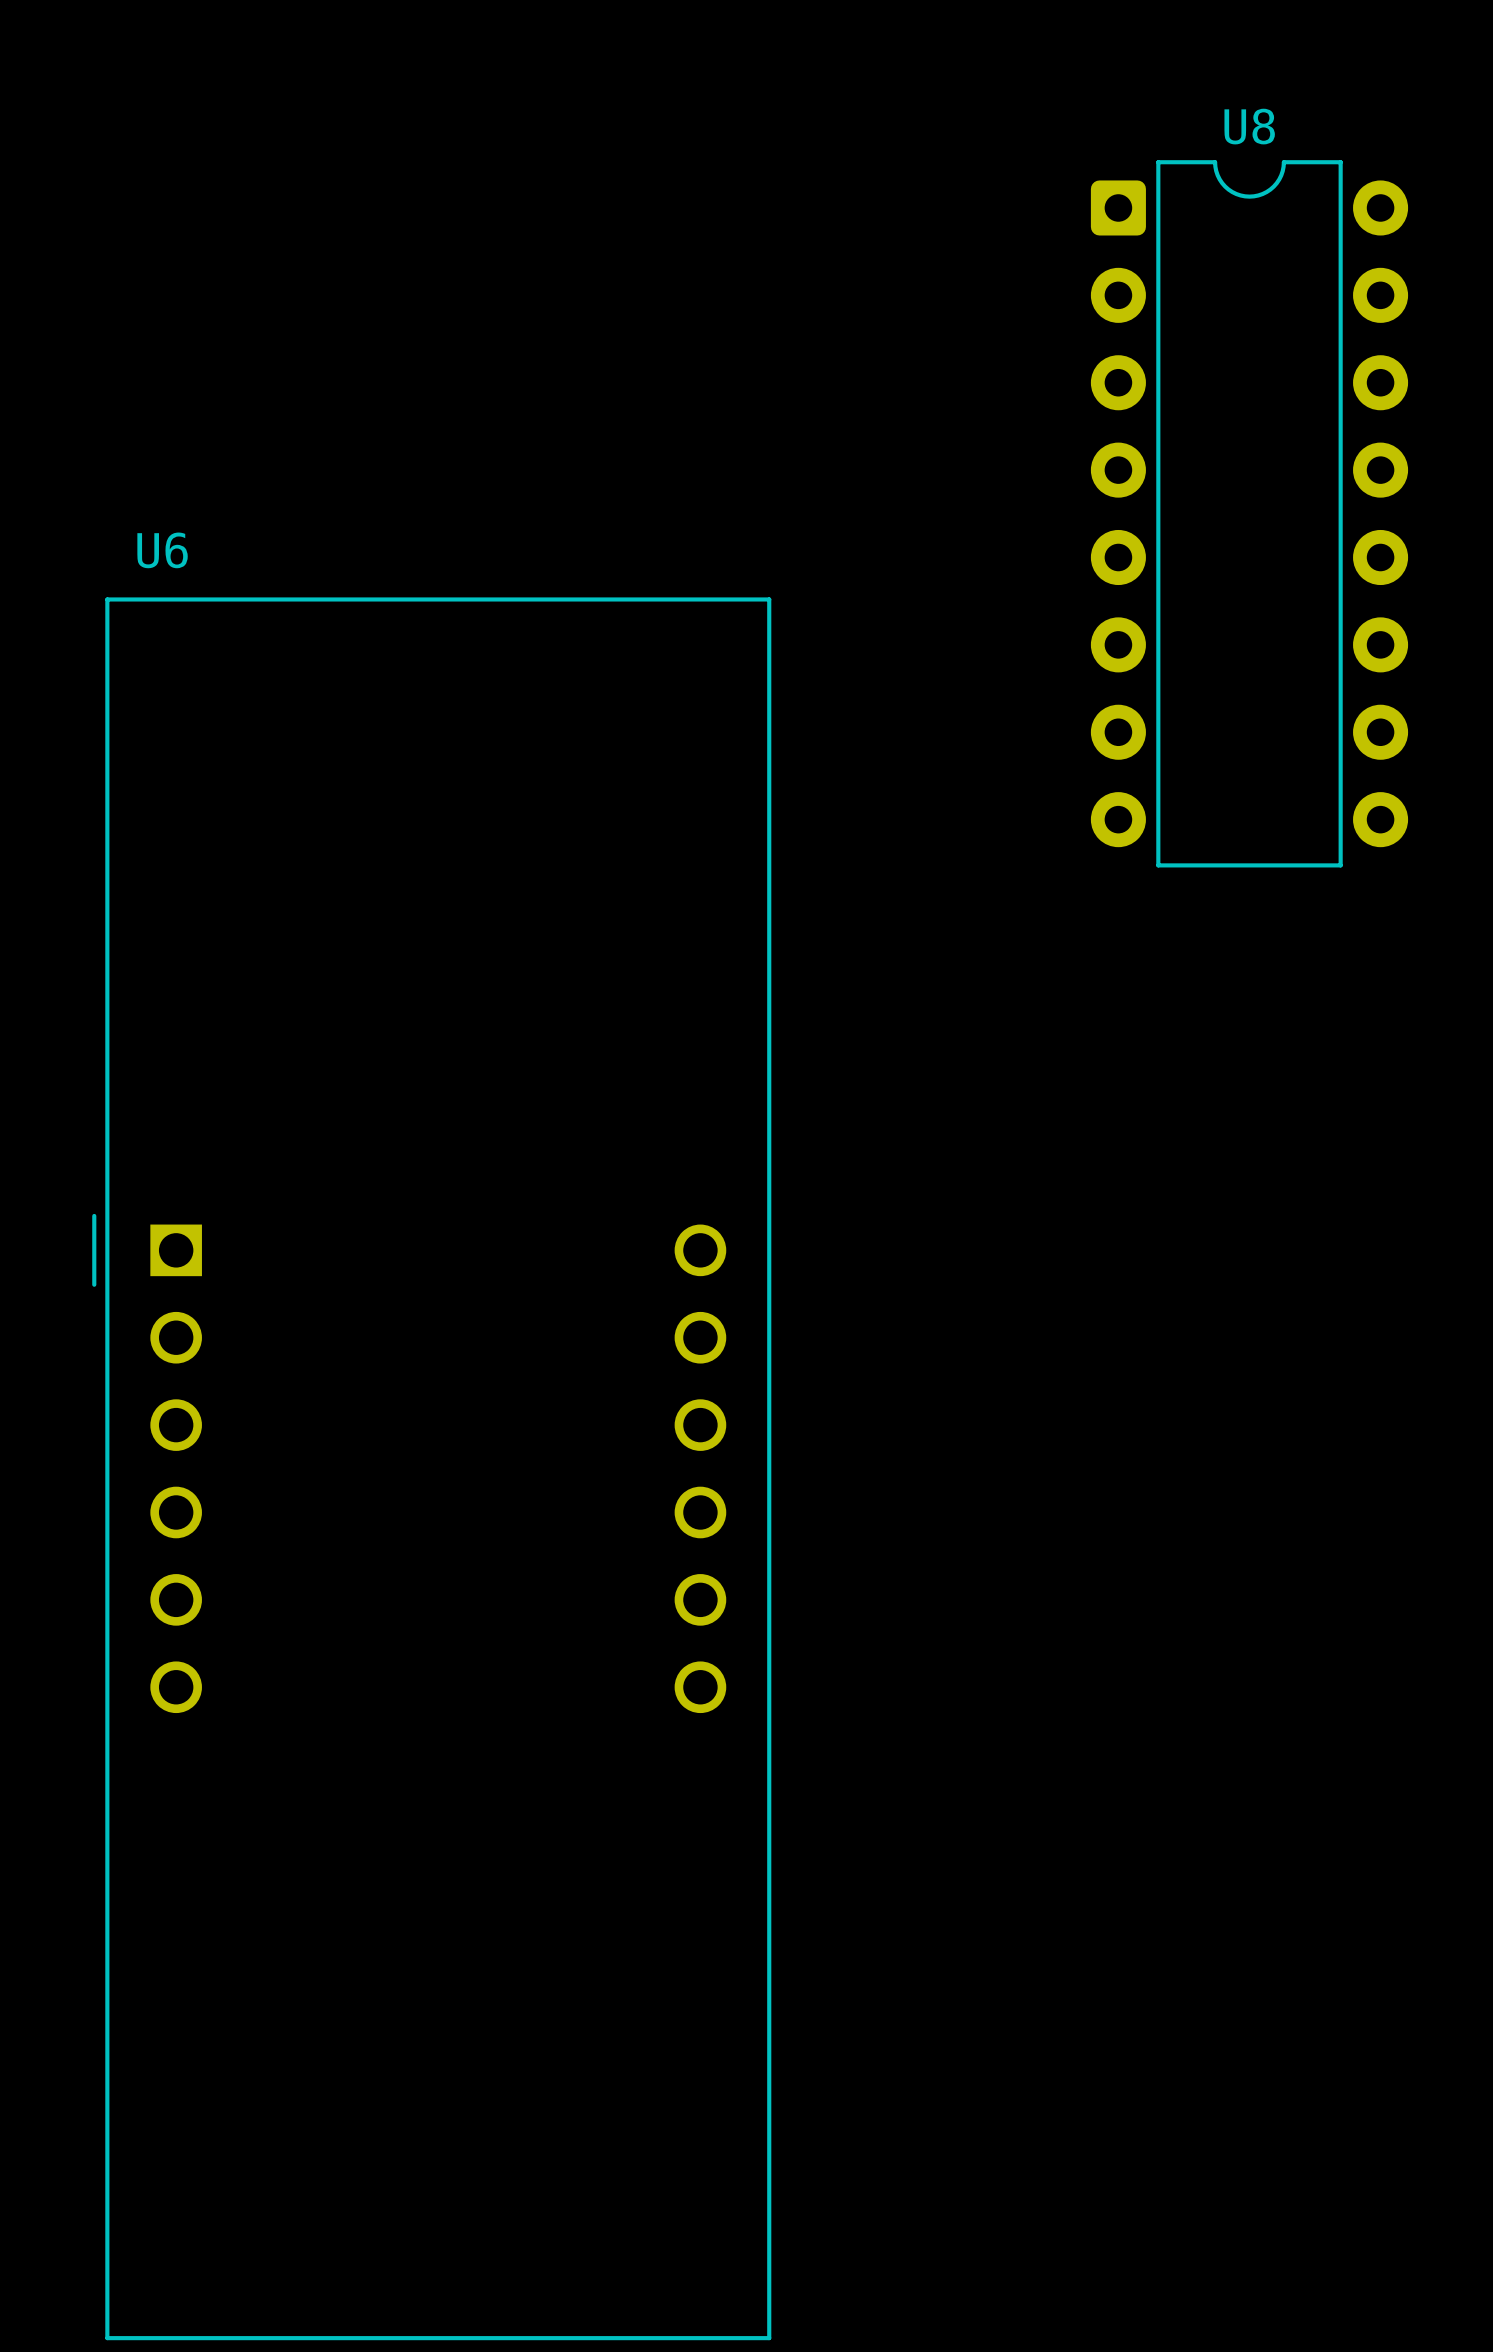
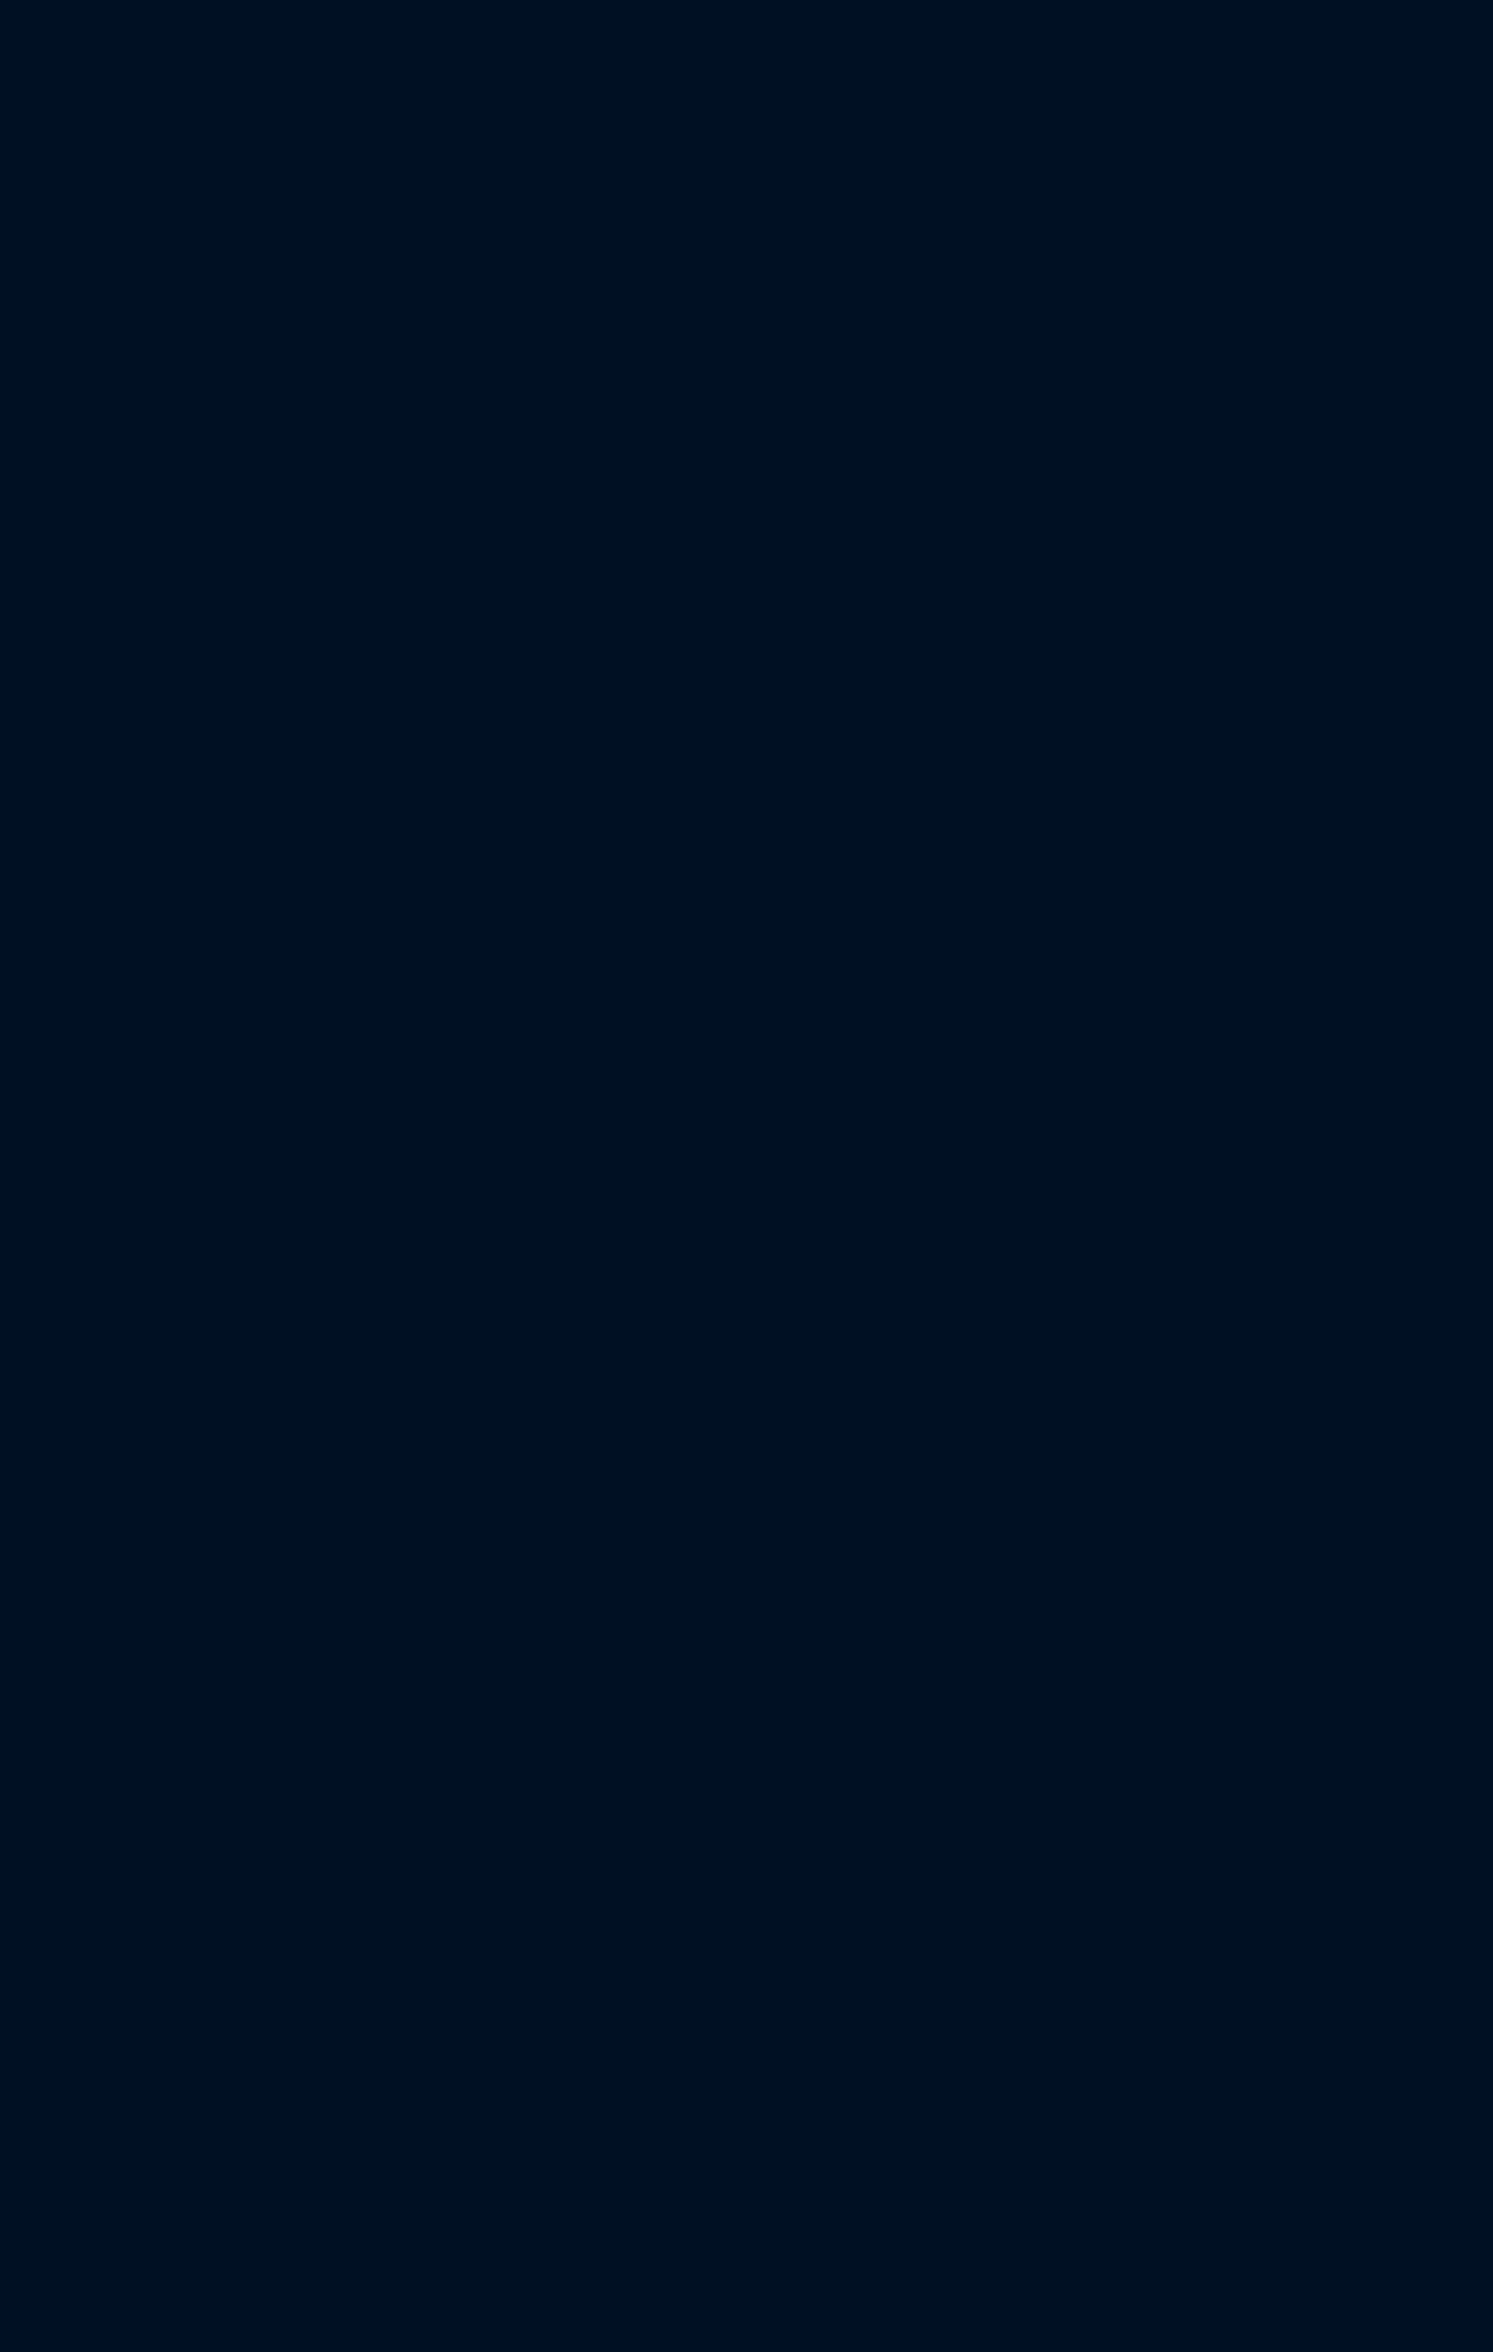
U8: (1249, 513) -> none
U6: (431, 1468) -> none

